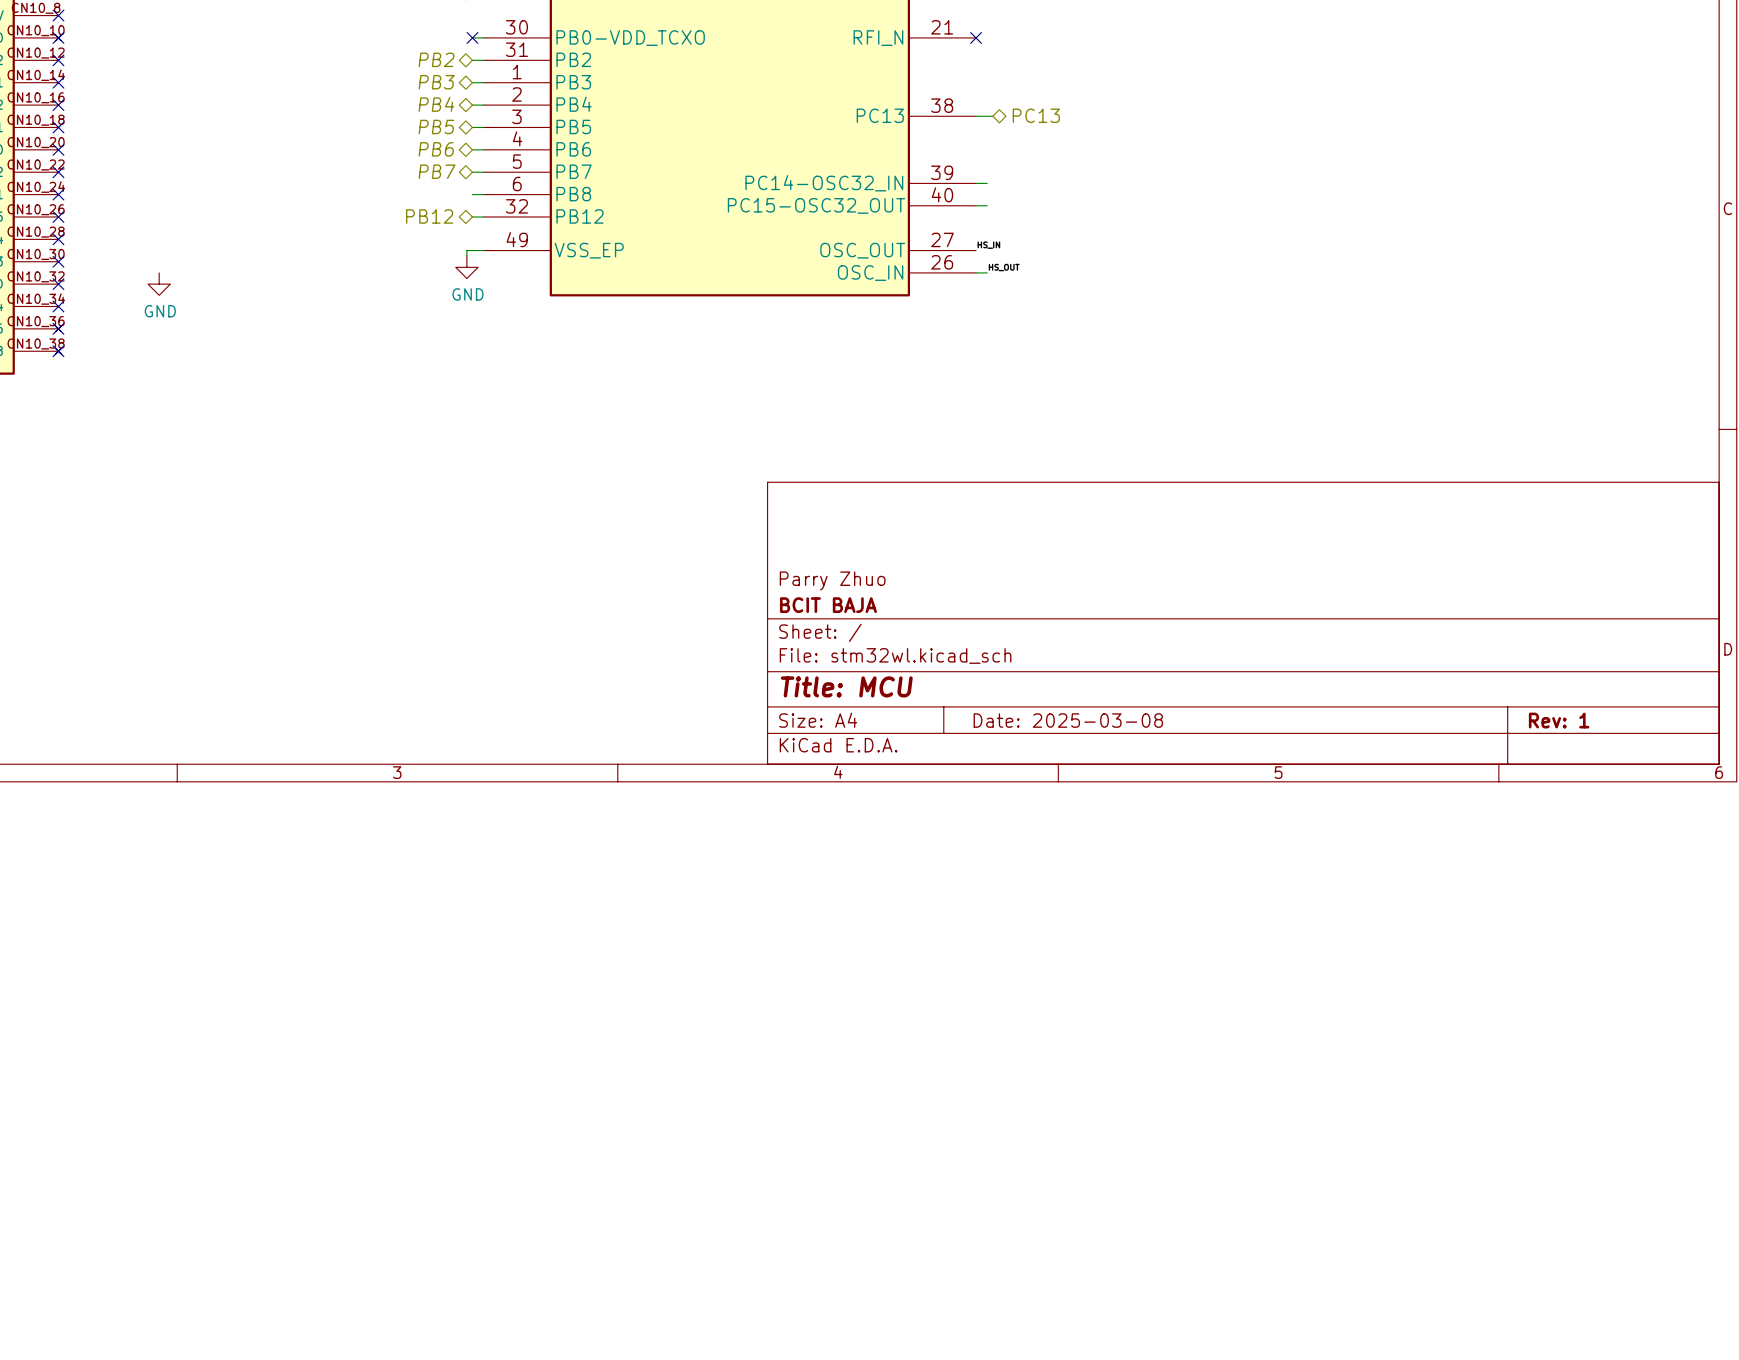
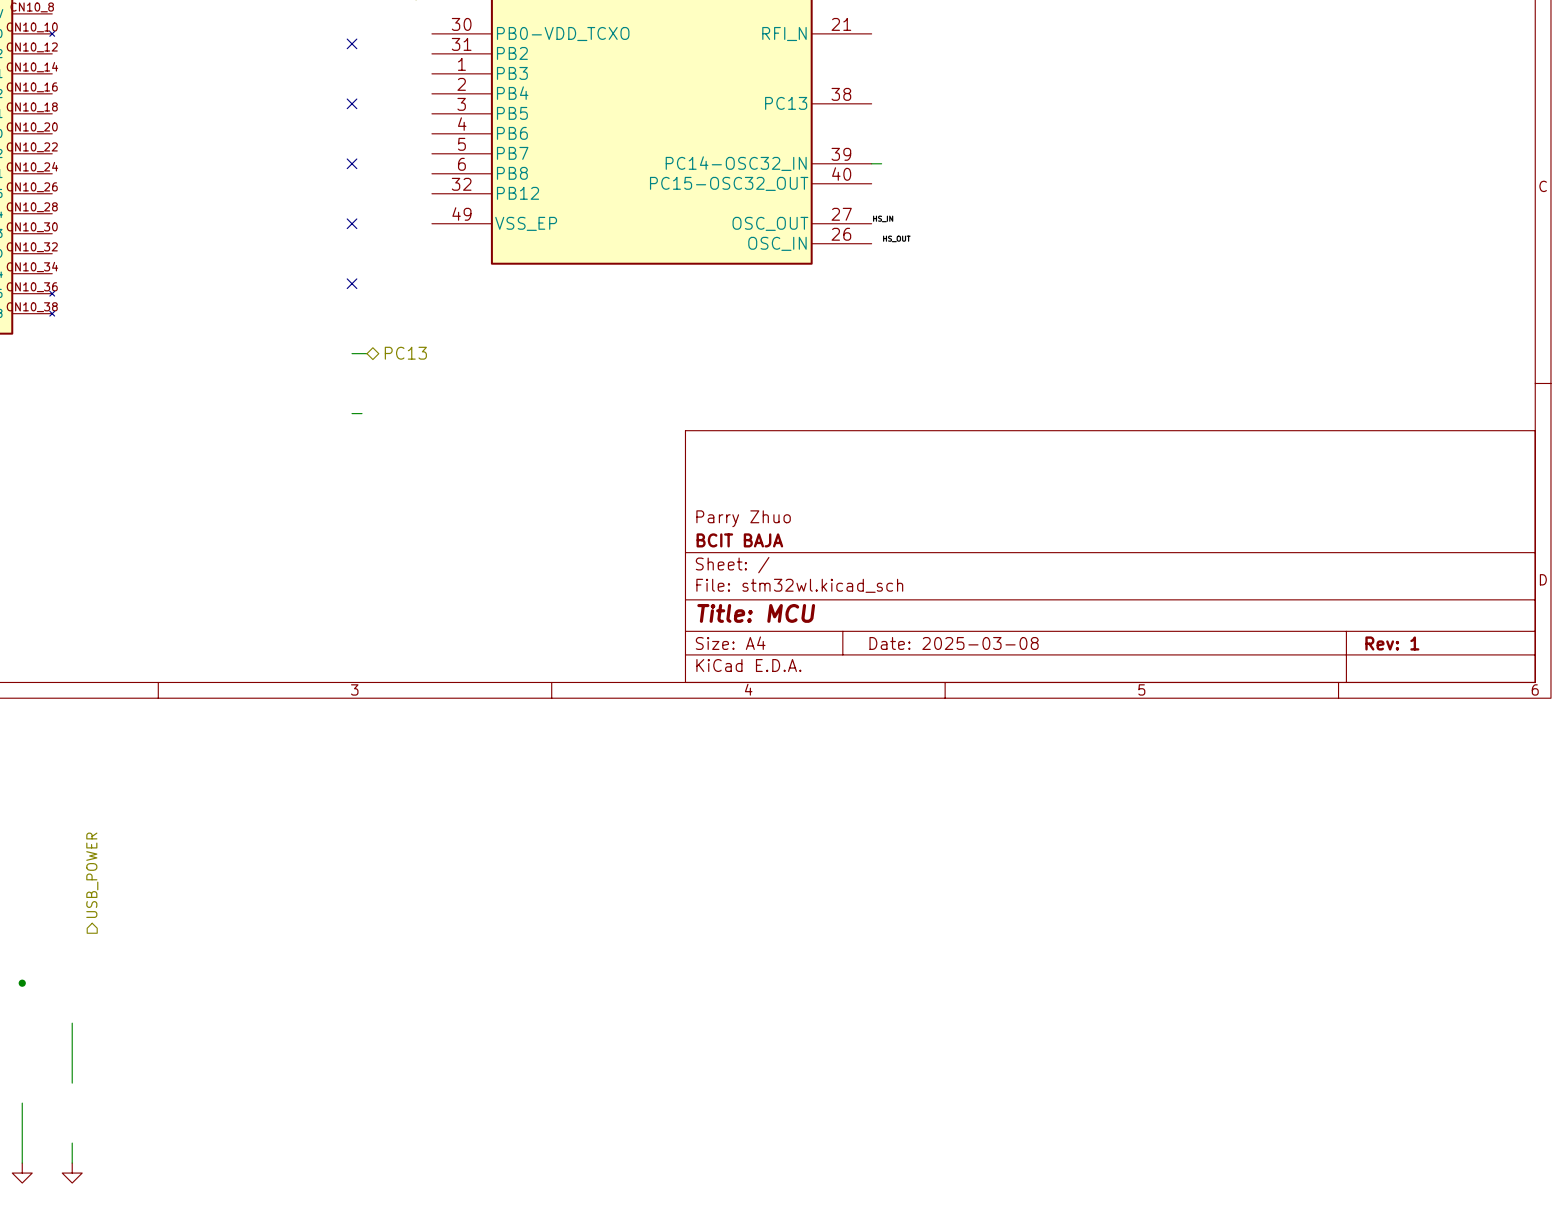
no-connect mark: (58, 15) -> none
no-connect mark: (58, 37) -> none
wire: (472, 37) (483, 37) -> none
no-connect mark: (472, 37) -> none
no-connect mark: (976, 37) -> none
no-connect mark: none -> (352, 43)
hierarchical label: PB2 (436, 59) -> none
no-connect mark: (58, 60) -> none
wire: (472, 60) (483, 60) -> none
no-connect mark: (58, 82) -> none
hierarchical label: PB3 (436, 82) -> none
wire: (472, 82) (483, 82) -> none
hierarchical label: PB4 (436, 104) -> none
no-connect mark: (58, 105) -> none
wire: (472, 105) (483, 105) -> none
hierarchical label: PC13 (1036, 115) -> none
no-connect mark: none -> (352, 103)
wire: (976, 116) (992, 116) -> none
hierarchical label: PB5 (436, 126) -> none
no-connect mark: (58, 127) -> none
wire: (472, 127) (483, 127) -> none
no-connect mark: (58, 149) -> none
hierarchical label: PB6 (436, 149) -> none
wire: (472, 149) (483, 149) -> none
hierarchical label: PB7 (437, 171) -> none
no-connect mark: (58, 172) -> none
wire: (472, 172) (483, 172) -> none
no-connect mark: none -> (352, 163)
no-connect mark: (58, 194) -> none
wire: (472, 194) (483, 194) -> none
wire: (976, 205) (987, 205) -> none
no-connect mark: (58, 216) -> none
hierarchical label: PB12 (429, 216) -> none
wire: (472, 216) (483, 216) -> none
no-connect mark: (58, 239) -> none
no-connect mark: none -> (352, 223)
wire: (483, 250) (466, 250) (466, 256) -> none
no-connect mark: (58, 261) -> none
power symbol: GND (466, 267) -> none
wire: (976, 272) (987, 272) -> none
no-connect mark: (58, 284) -> none
power symbol: GND (159, 284) -> none
no-connect mark: (58, 306) -> none
no-connect mark: none -> (352, 283)
no-connect mark: (58, 328) -> none
no-connect mark: (58, 351) -> none
hierarchical label: none -> PC13 (405, 353)
wire: none -> (352, 353) (367, 353)
wire: none -> (352, 413) (362, 413)
hierarchical label: none -> USB_POWER (92, 875)
junction: none -> (22, 983)
wire: none -> (72, 1023) (72, 1083)
wire: none -> (22, 1103) (22, 1163)
wire: none -> (72, 1143) (72, 1163)
power symbol: none -> (22, 1173)
power symbol: none -> (72, 1173)

